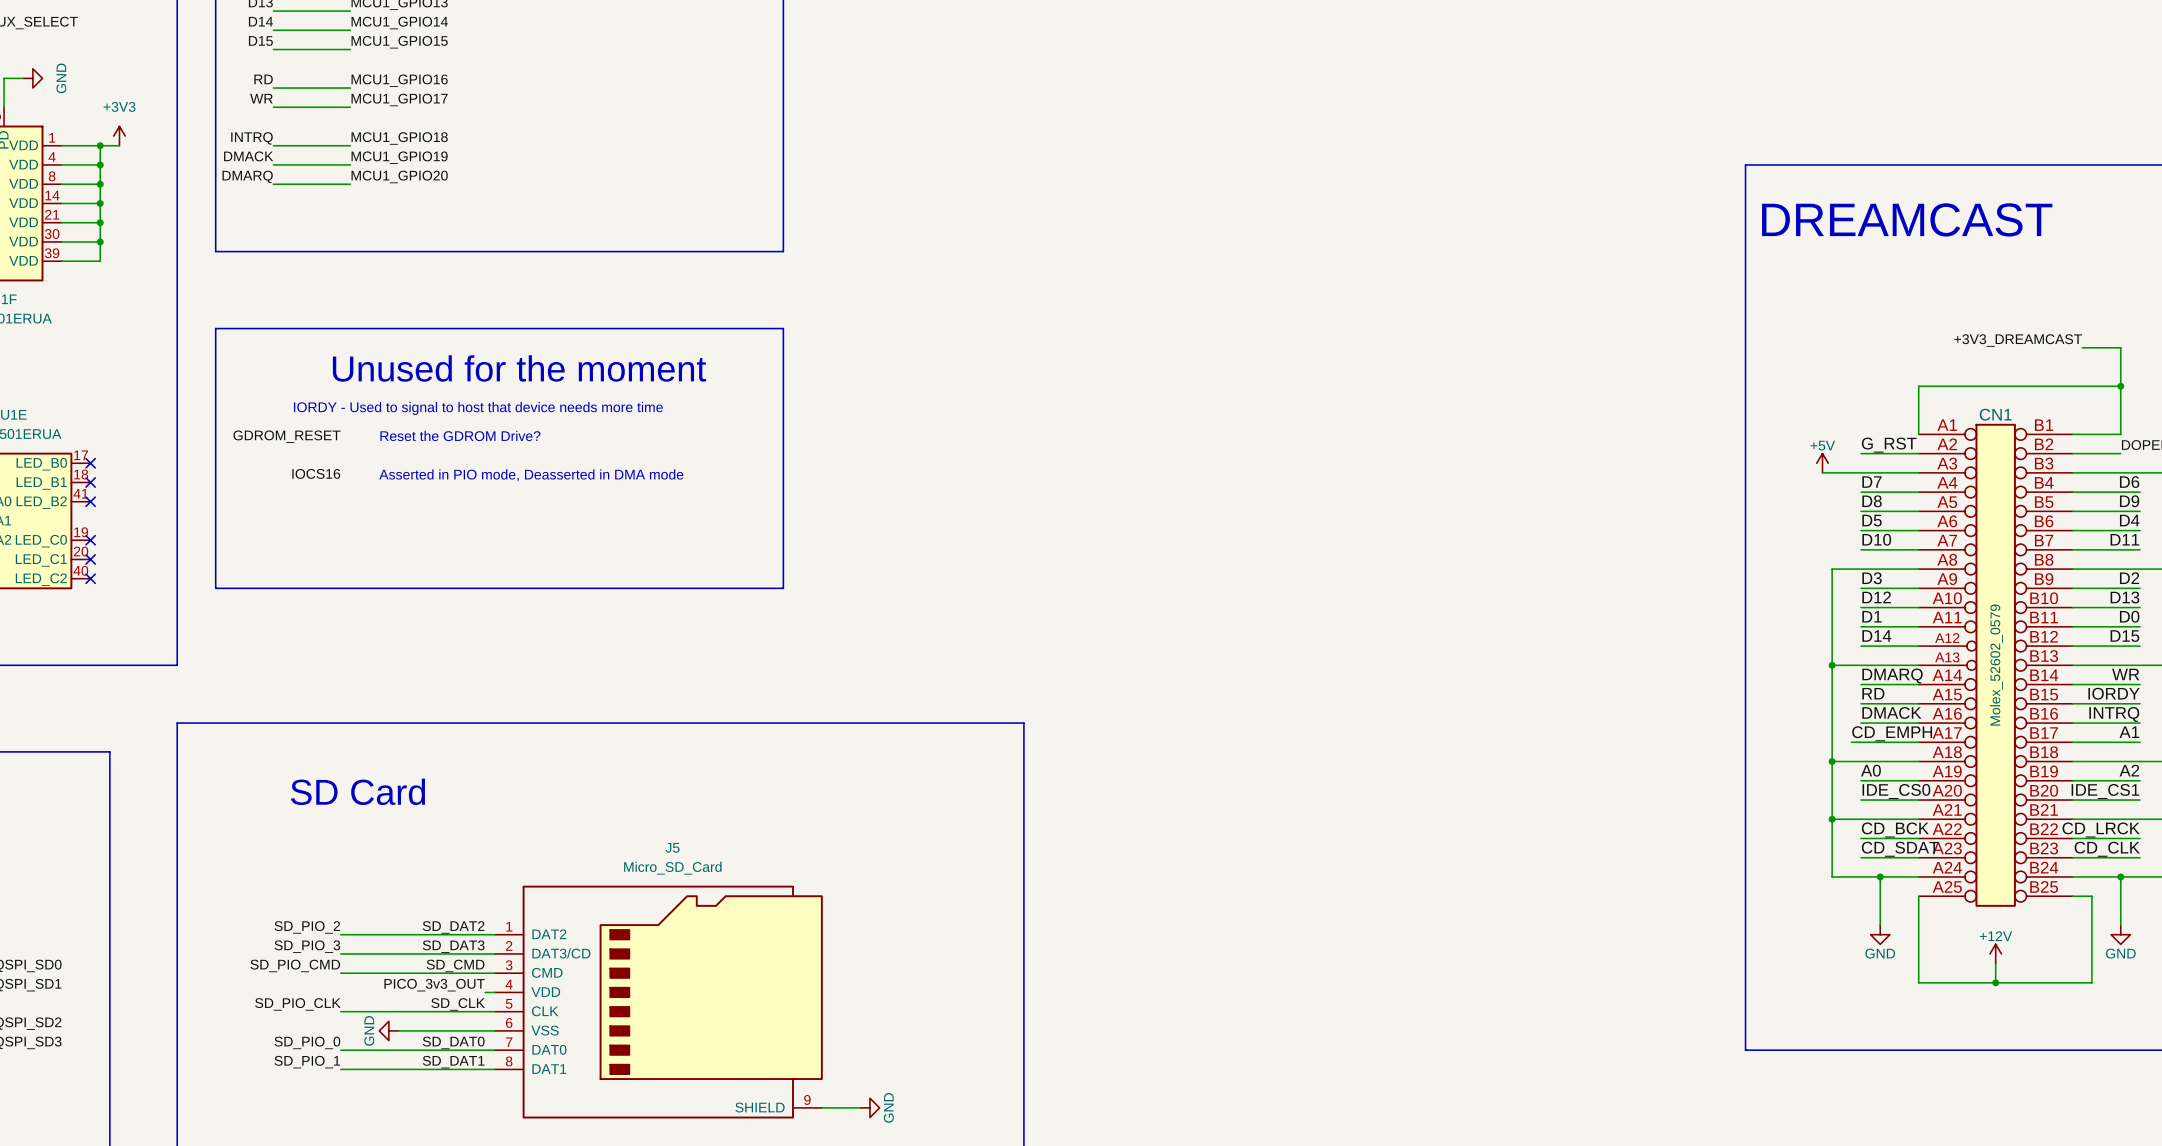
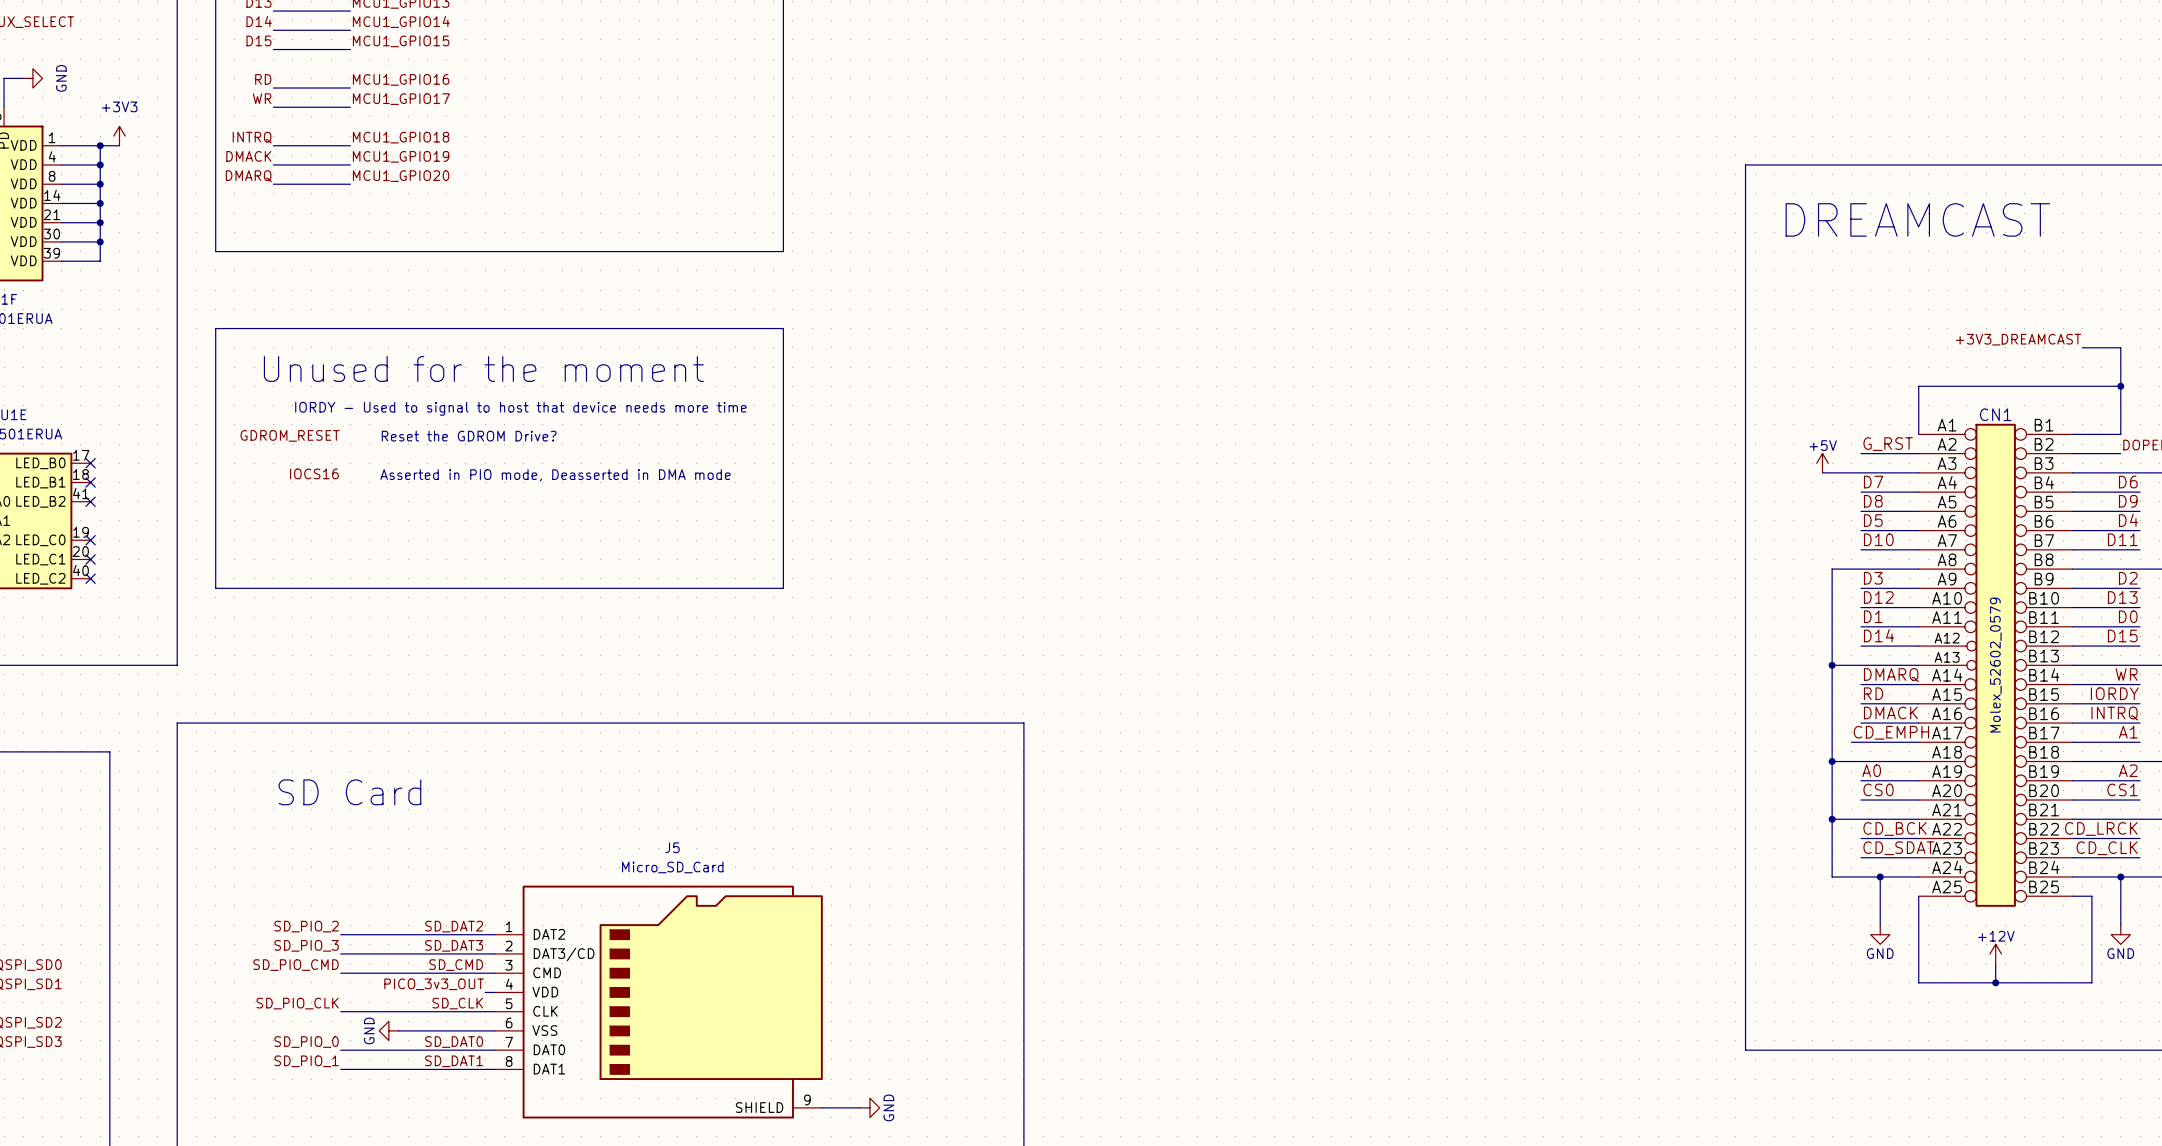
label: IDE_CS0 (1896, 791) -> CS0 (1878, 789)
label: IDE_CS1 (2105, 791) -> CS1 (2122, 789)

